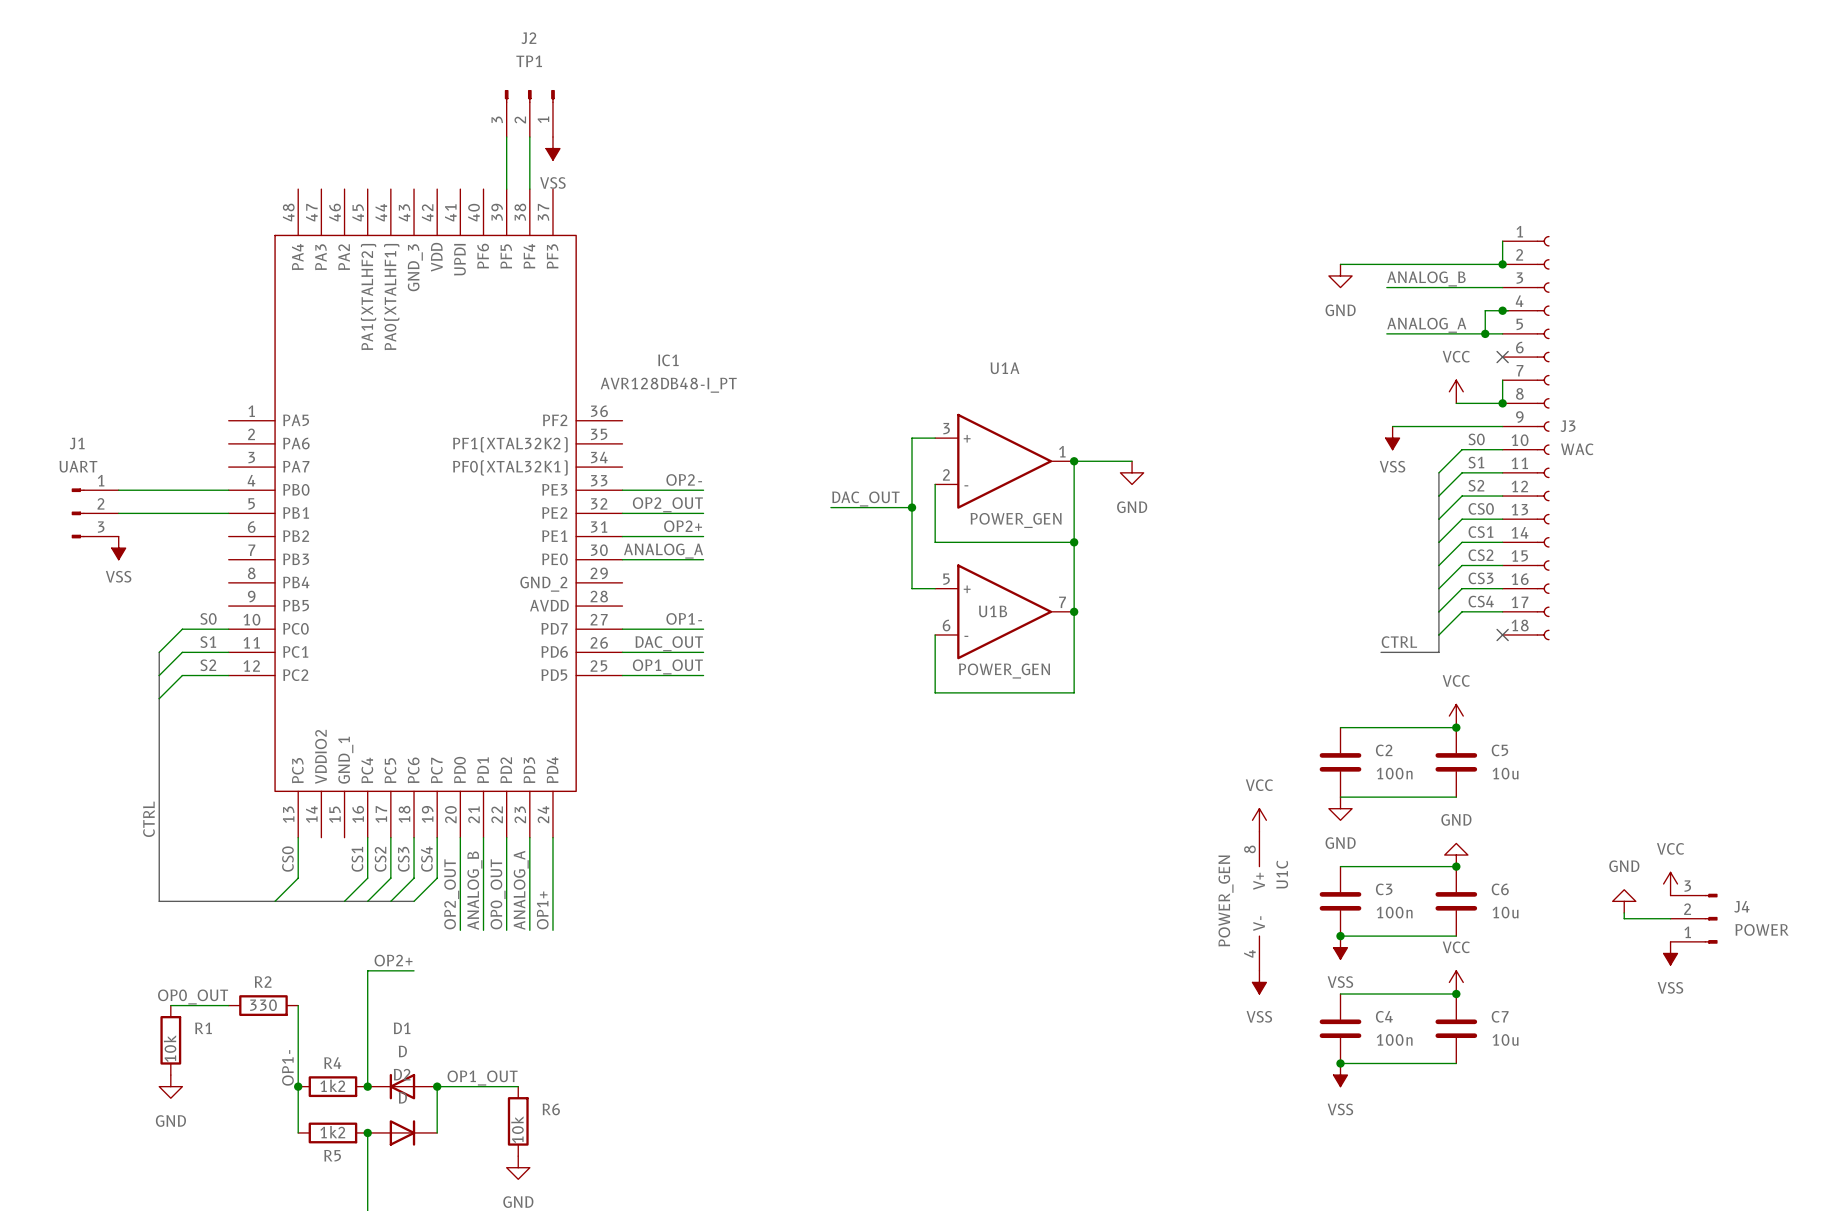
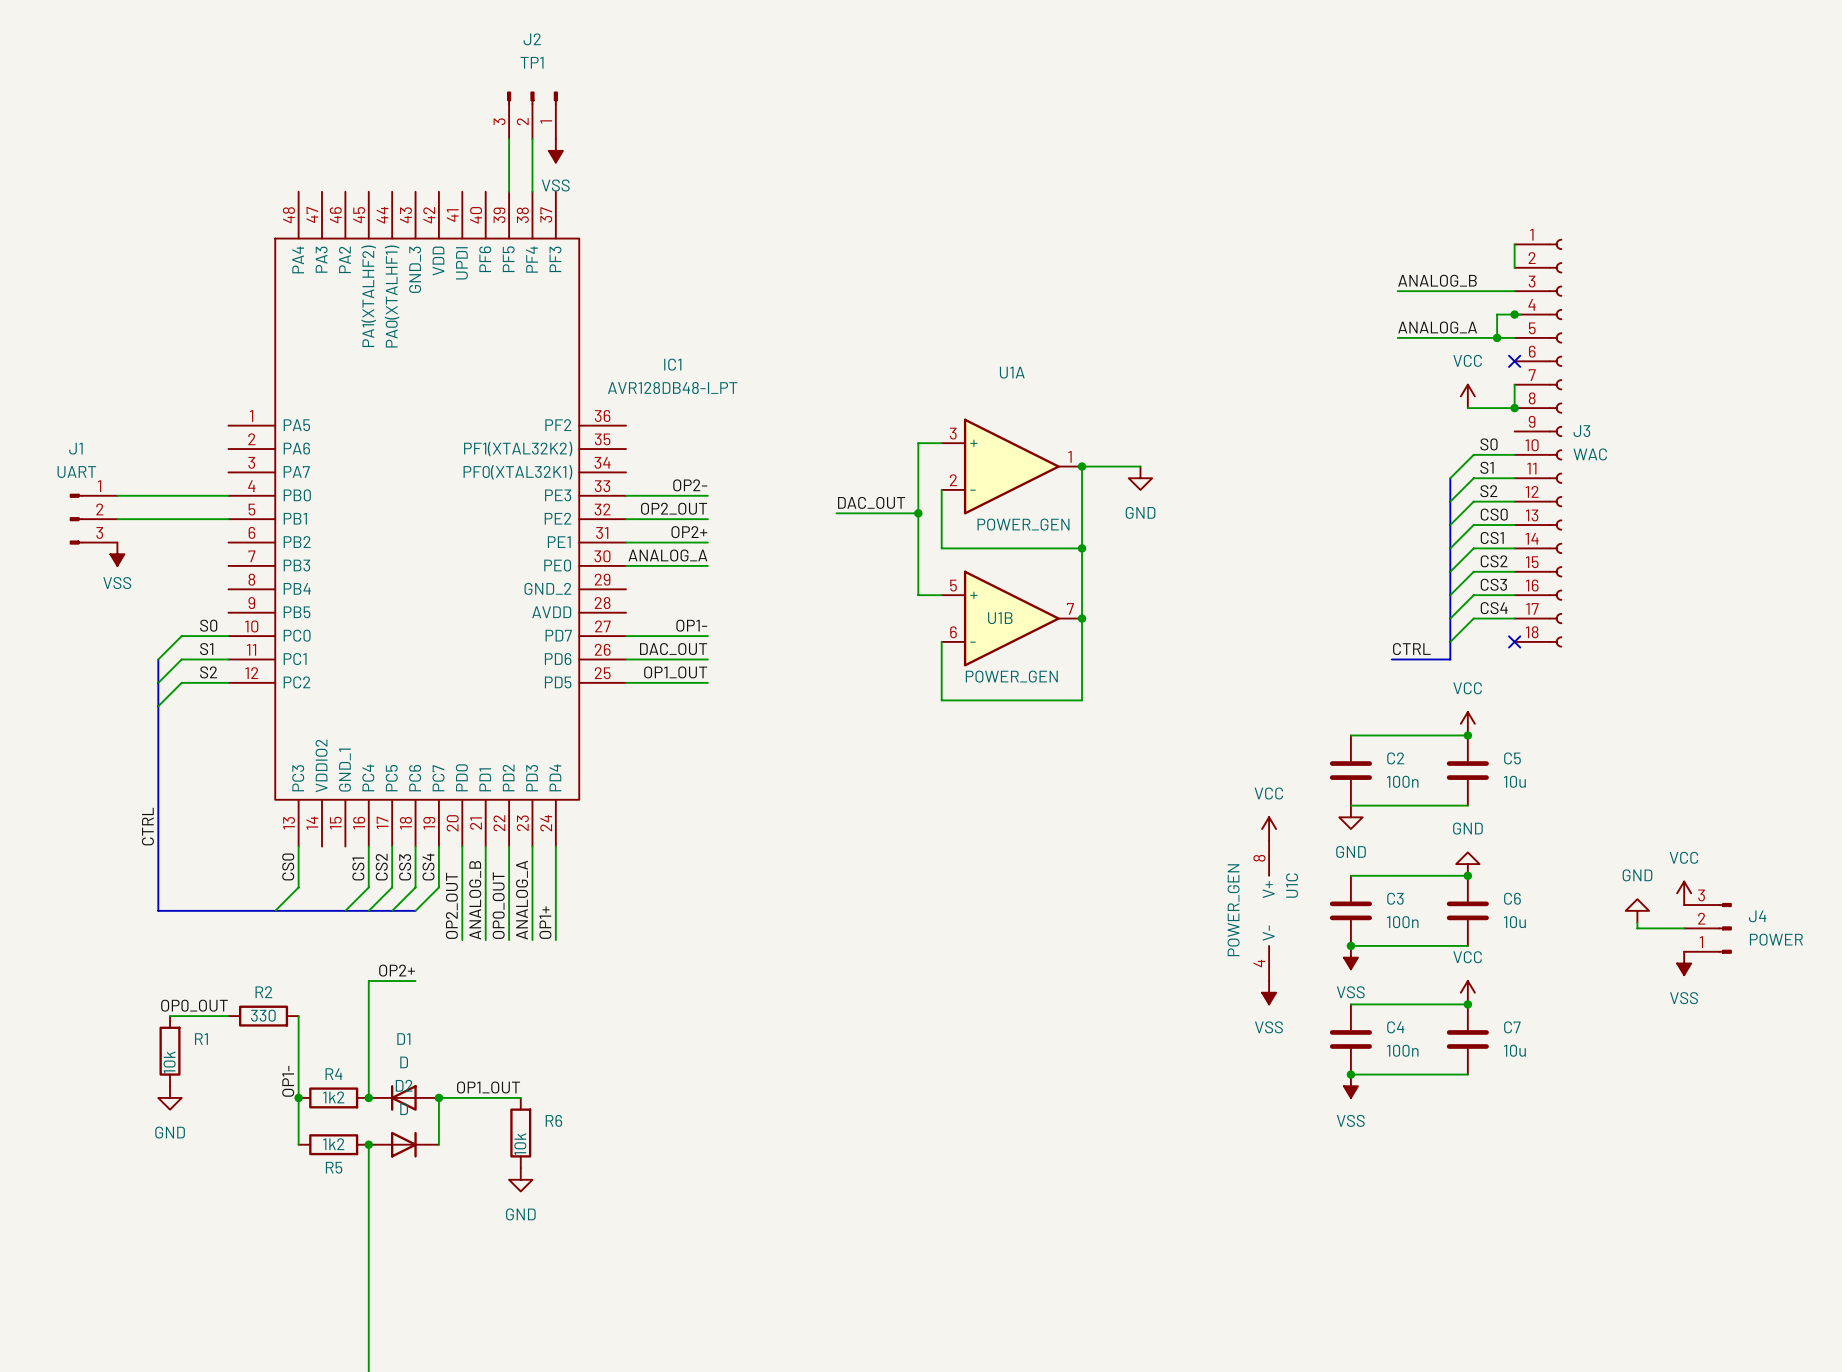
wire: (1340, 264) (1502, 264) -> none
junction: (1502, 264) -> none
power symbol: GND (1340, 275) -> none
wire: (1392, 426) (1502, 426) -> none
power symbol: VSS (1392, 438) -> none

